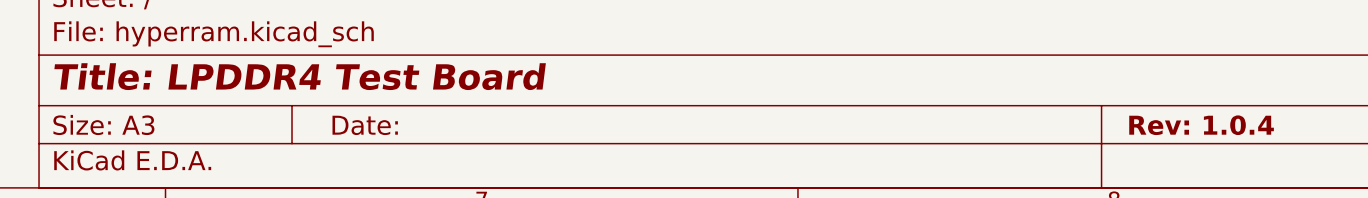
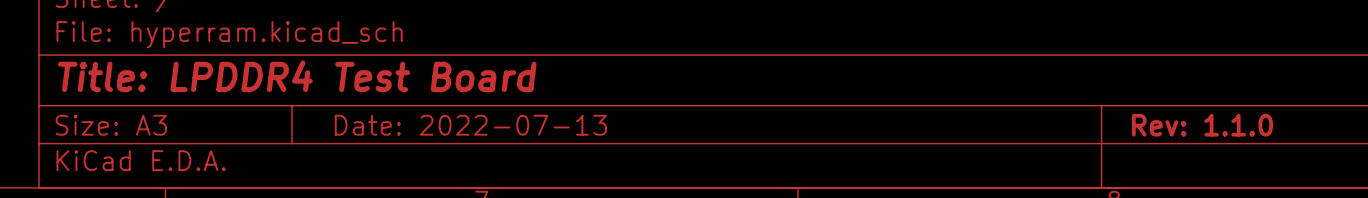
title block: Date: (365, 125) -> Date: 2022-07-13 (470, 125)
title block: Rev: 1.0.4 (1201, 125) -> Rev: 1.1.0 (1202, 125)

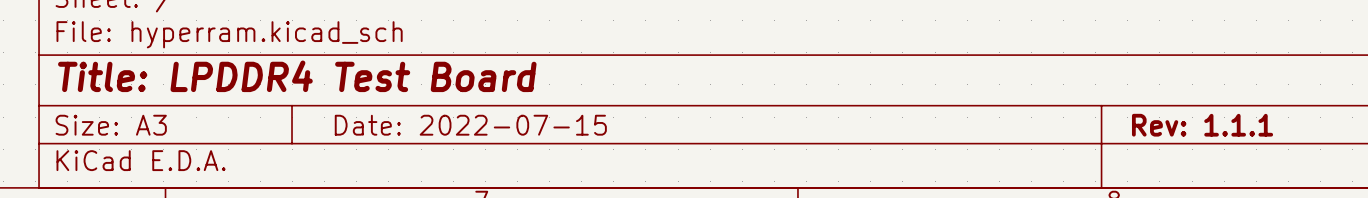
title block: Date: 2022-07-13 (470, 125) -> Date: 2022-07-15 (470, 125)
title block: Rev: 1.1.0 (1202, 125) -> Rev: 1.1.1 (1202, 125)

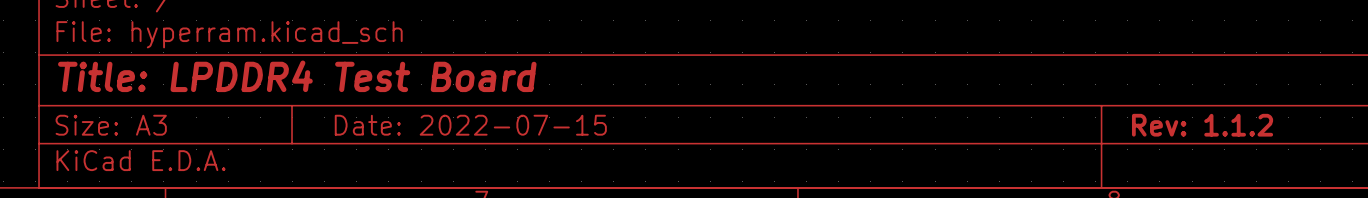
title block: Rev: 1.1.1 (1202, 125) -> Rev: 1.1.2 (1202, 125)

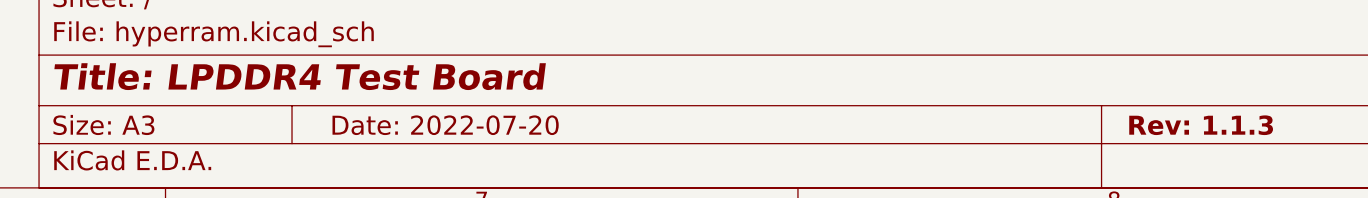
title block: Date: 2022-07-15 (470, 125) -> Date: 2022-07-20 (445, 125)
title block: Rev: 1.1.2 (1202, 125) -> Rev: 1.1.3 (1201, 125)

